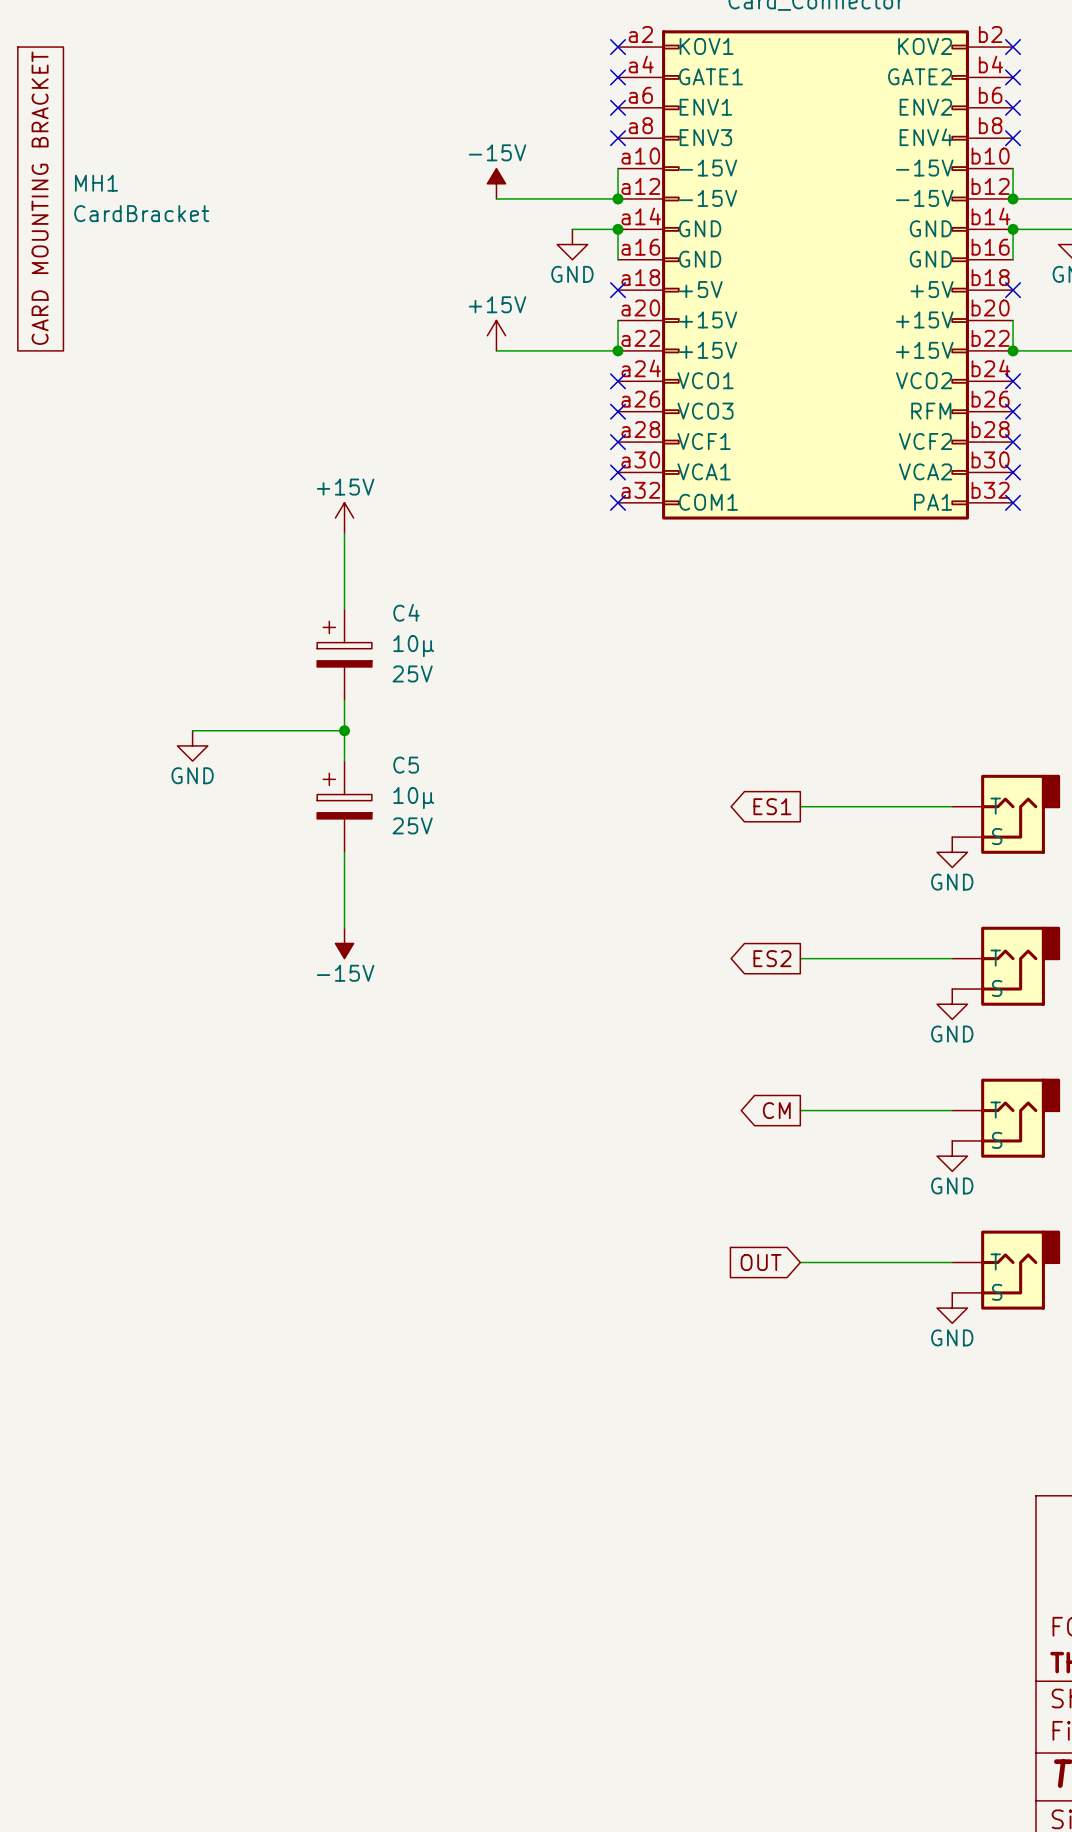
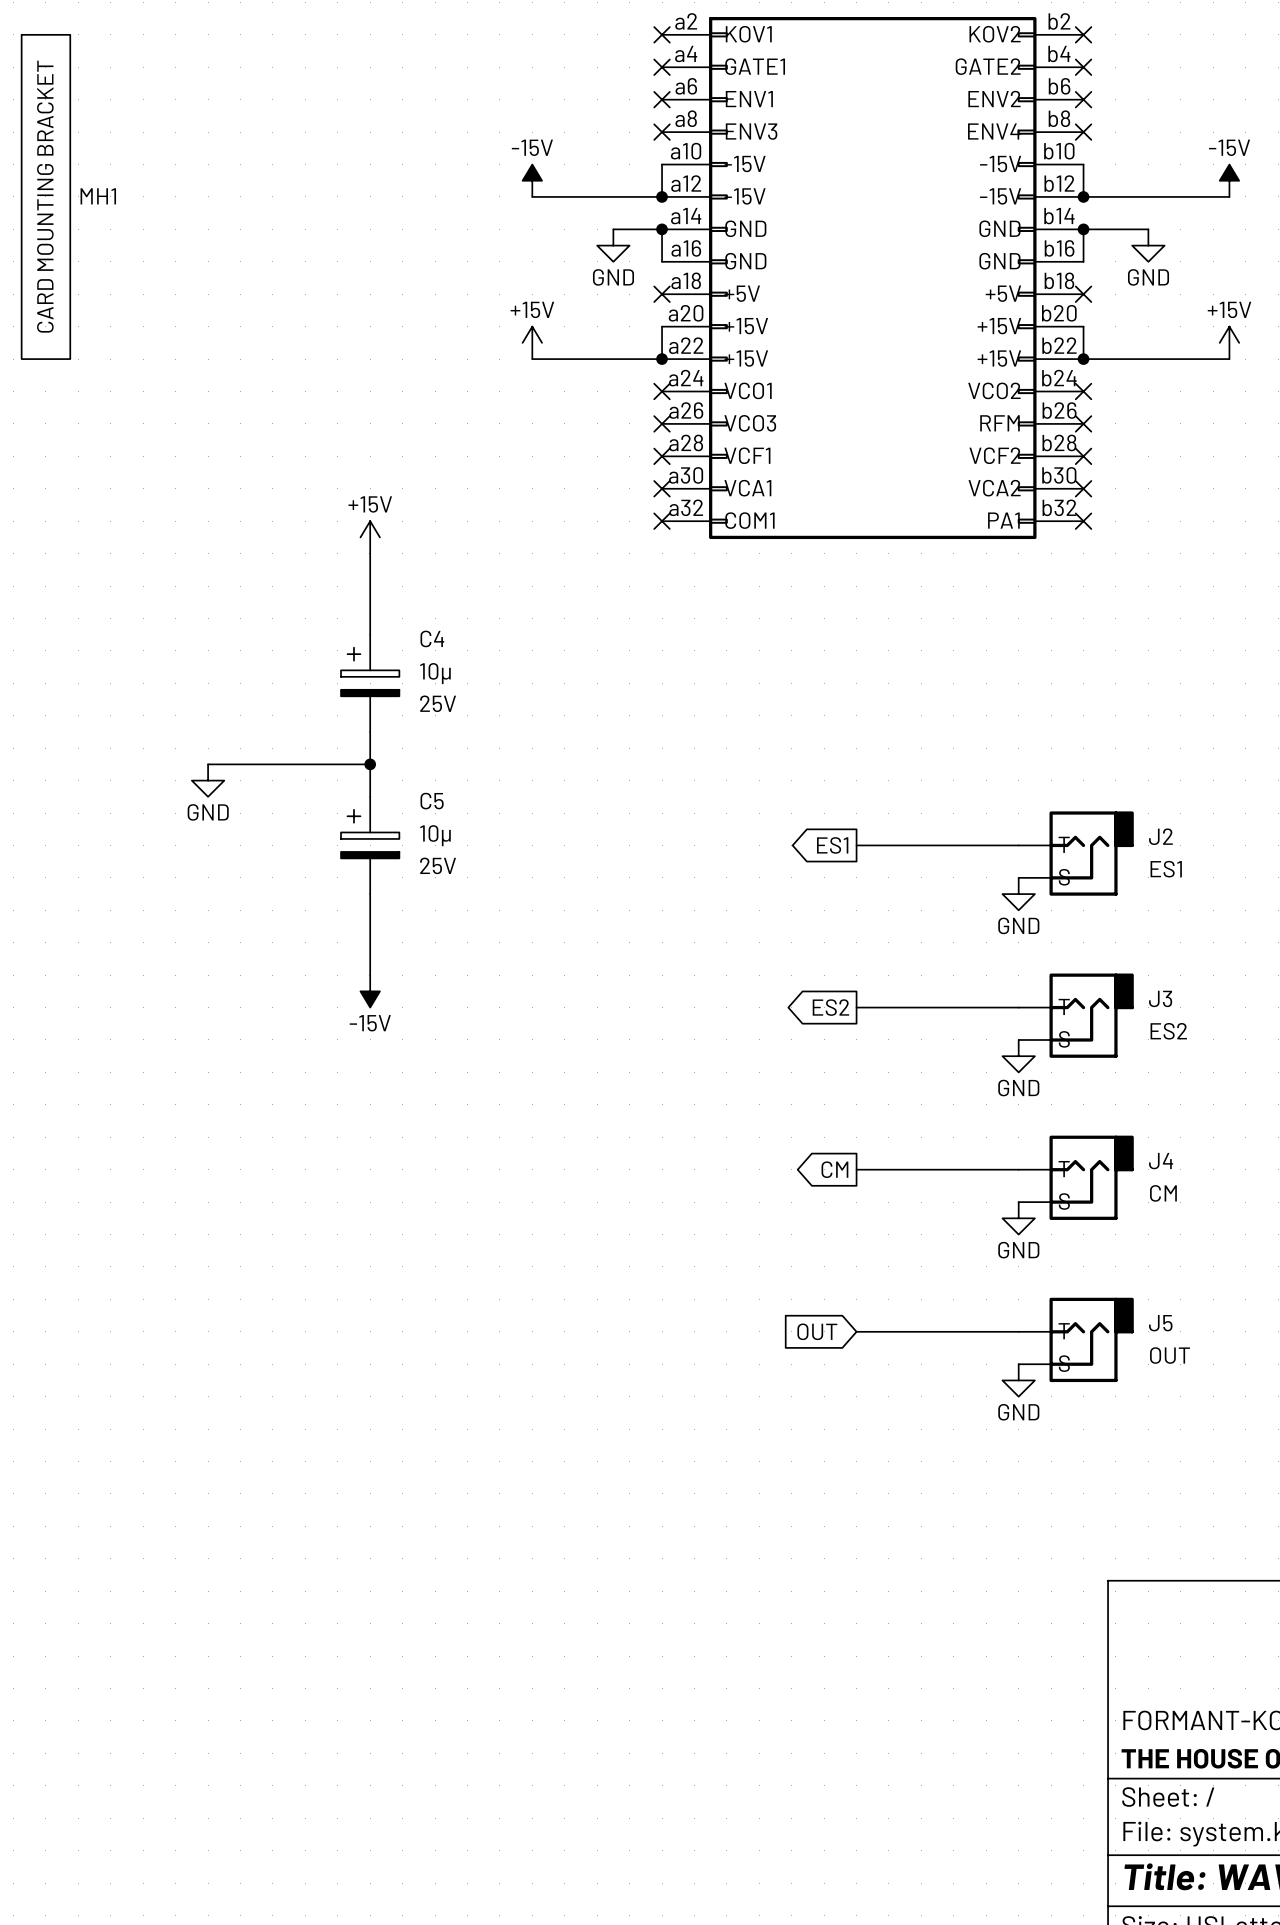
MH1 name position: MH1 (96, 183) -> MH1 (98, 196)
MH1 value: CardBracket (141, 213) -> none

